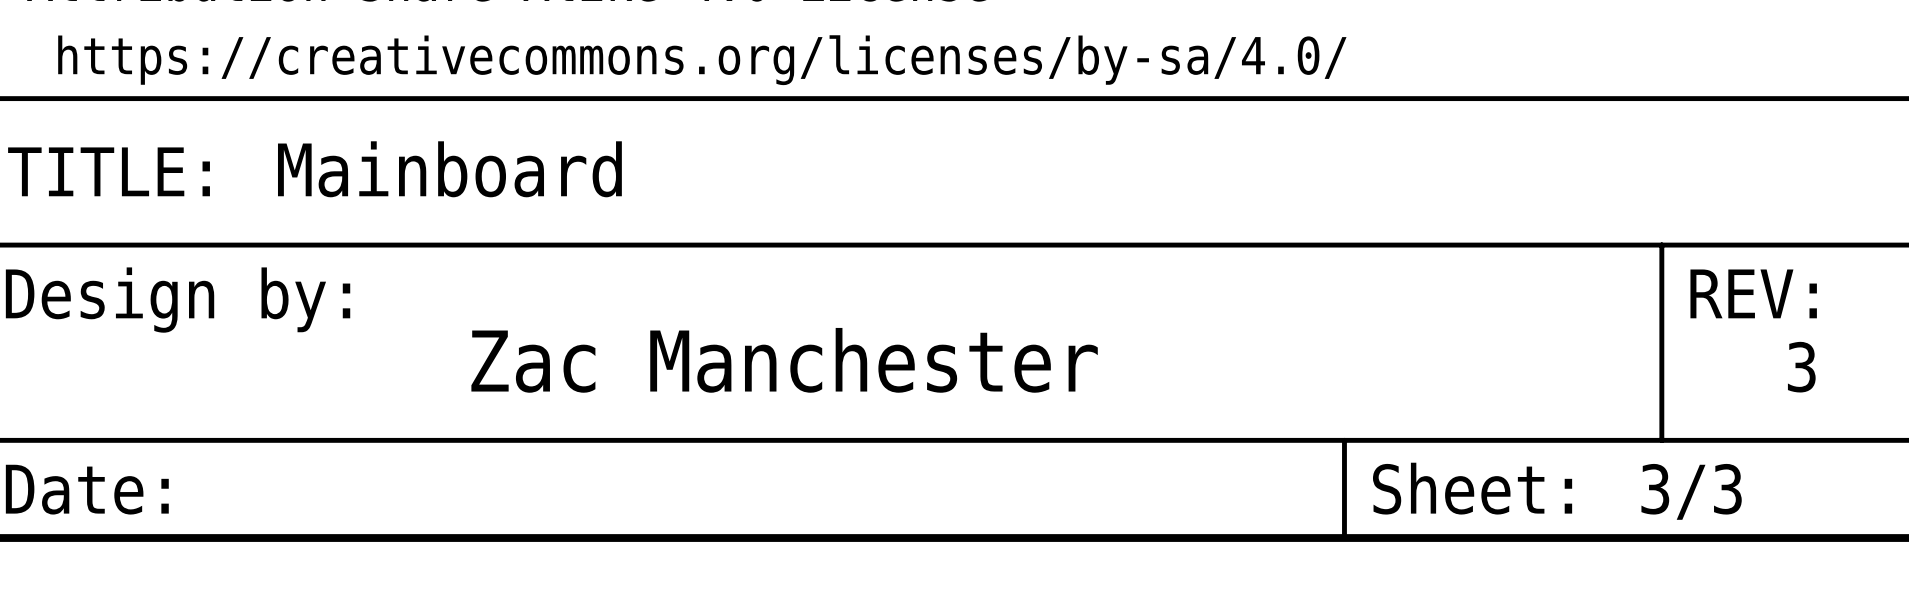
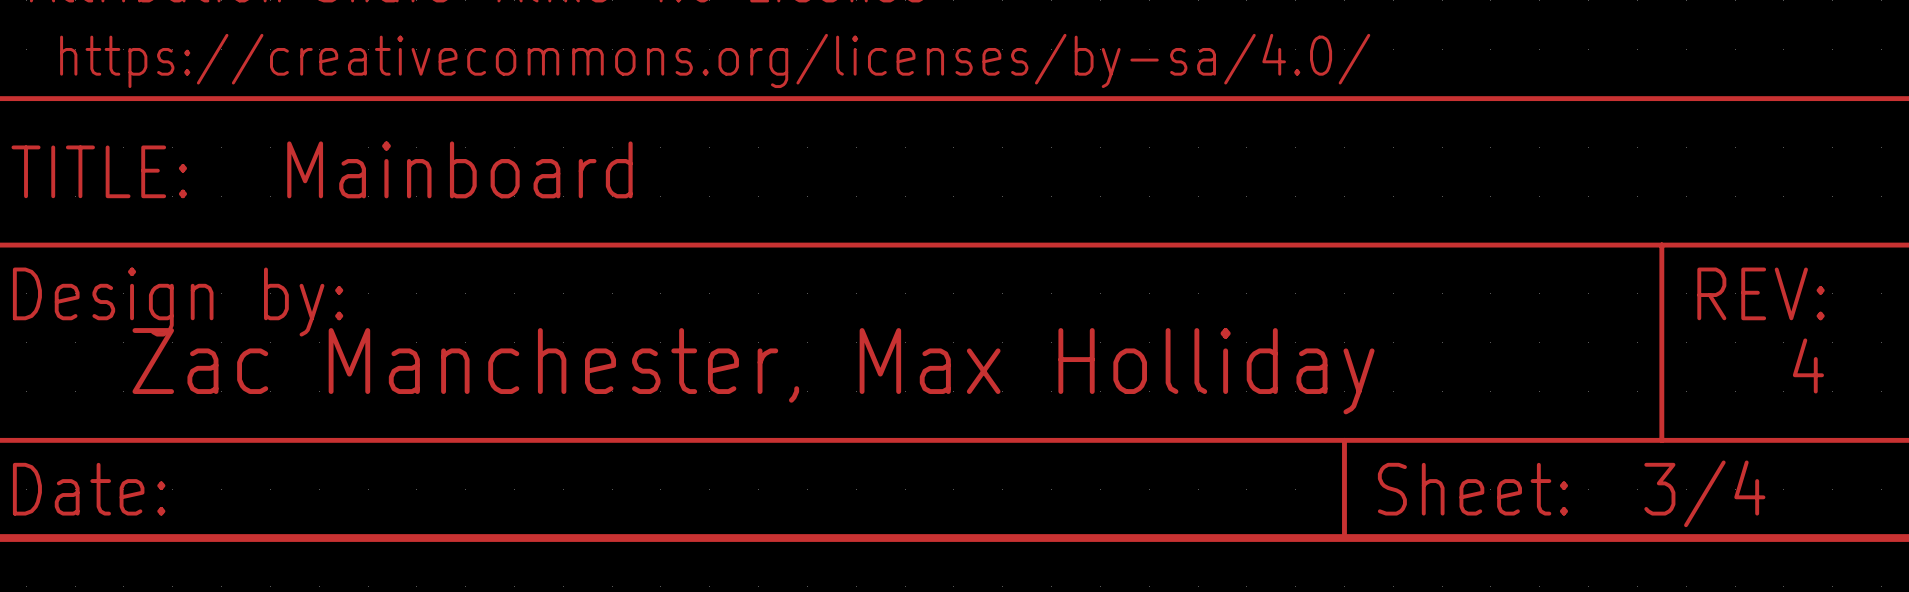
text: Zac Manchester (784, 360) -> Zac Manchester, Max Holliday (753, 371)
text: 3 (1801, 367) -> 4 (1808, 365)
part text: 3/3 (1691, 491) -> 3/4 (1704, 493)

